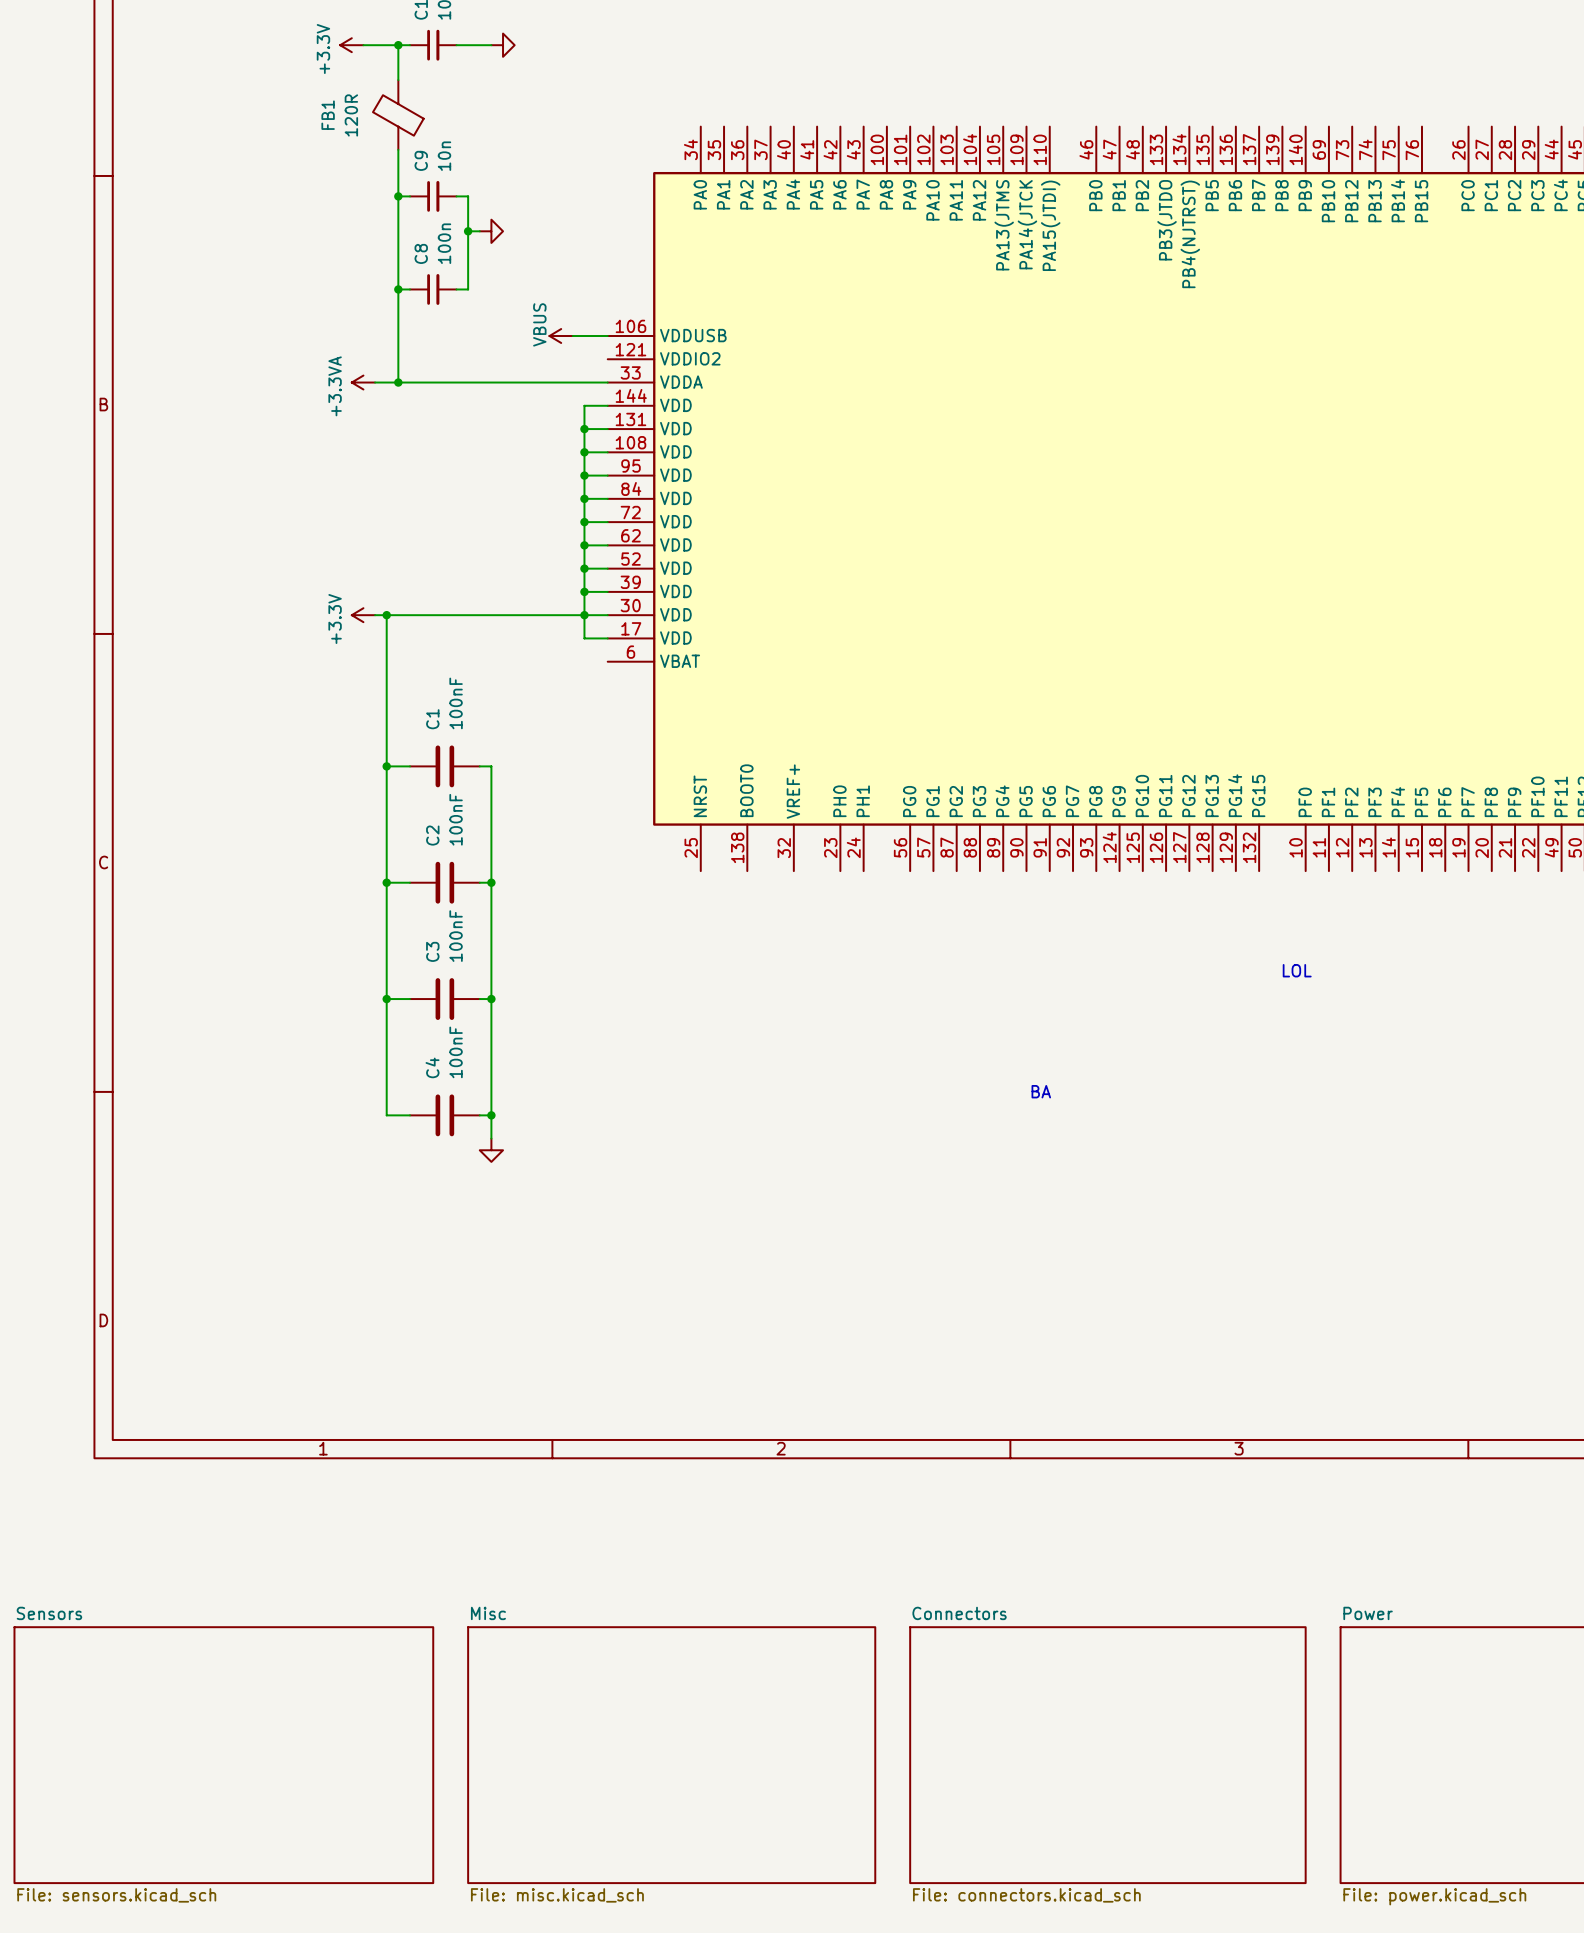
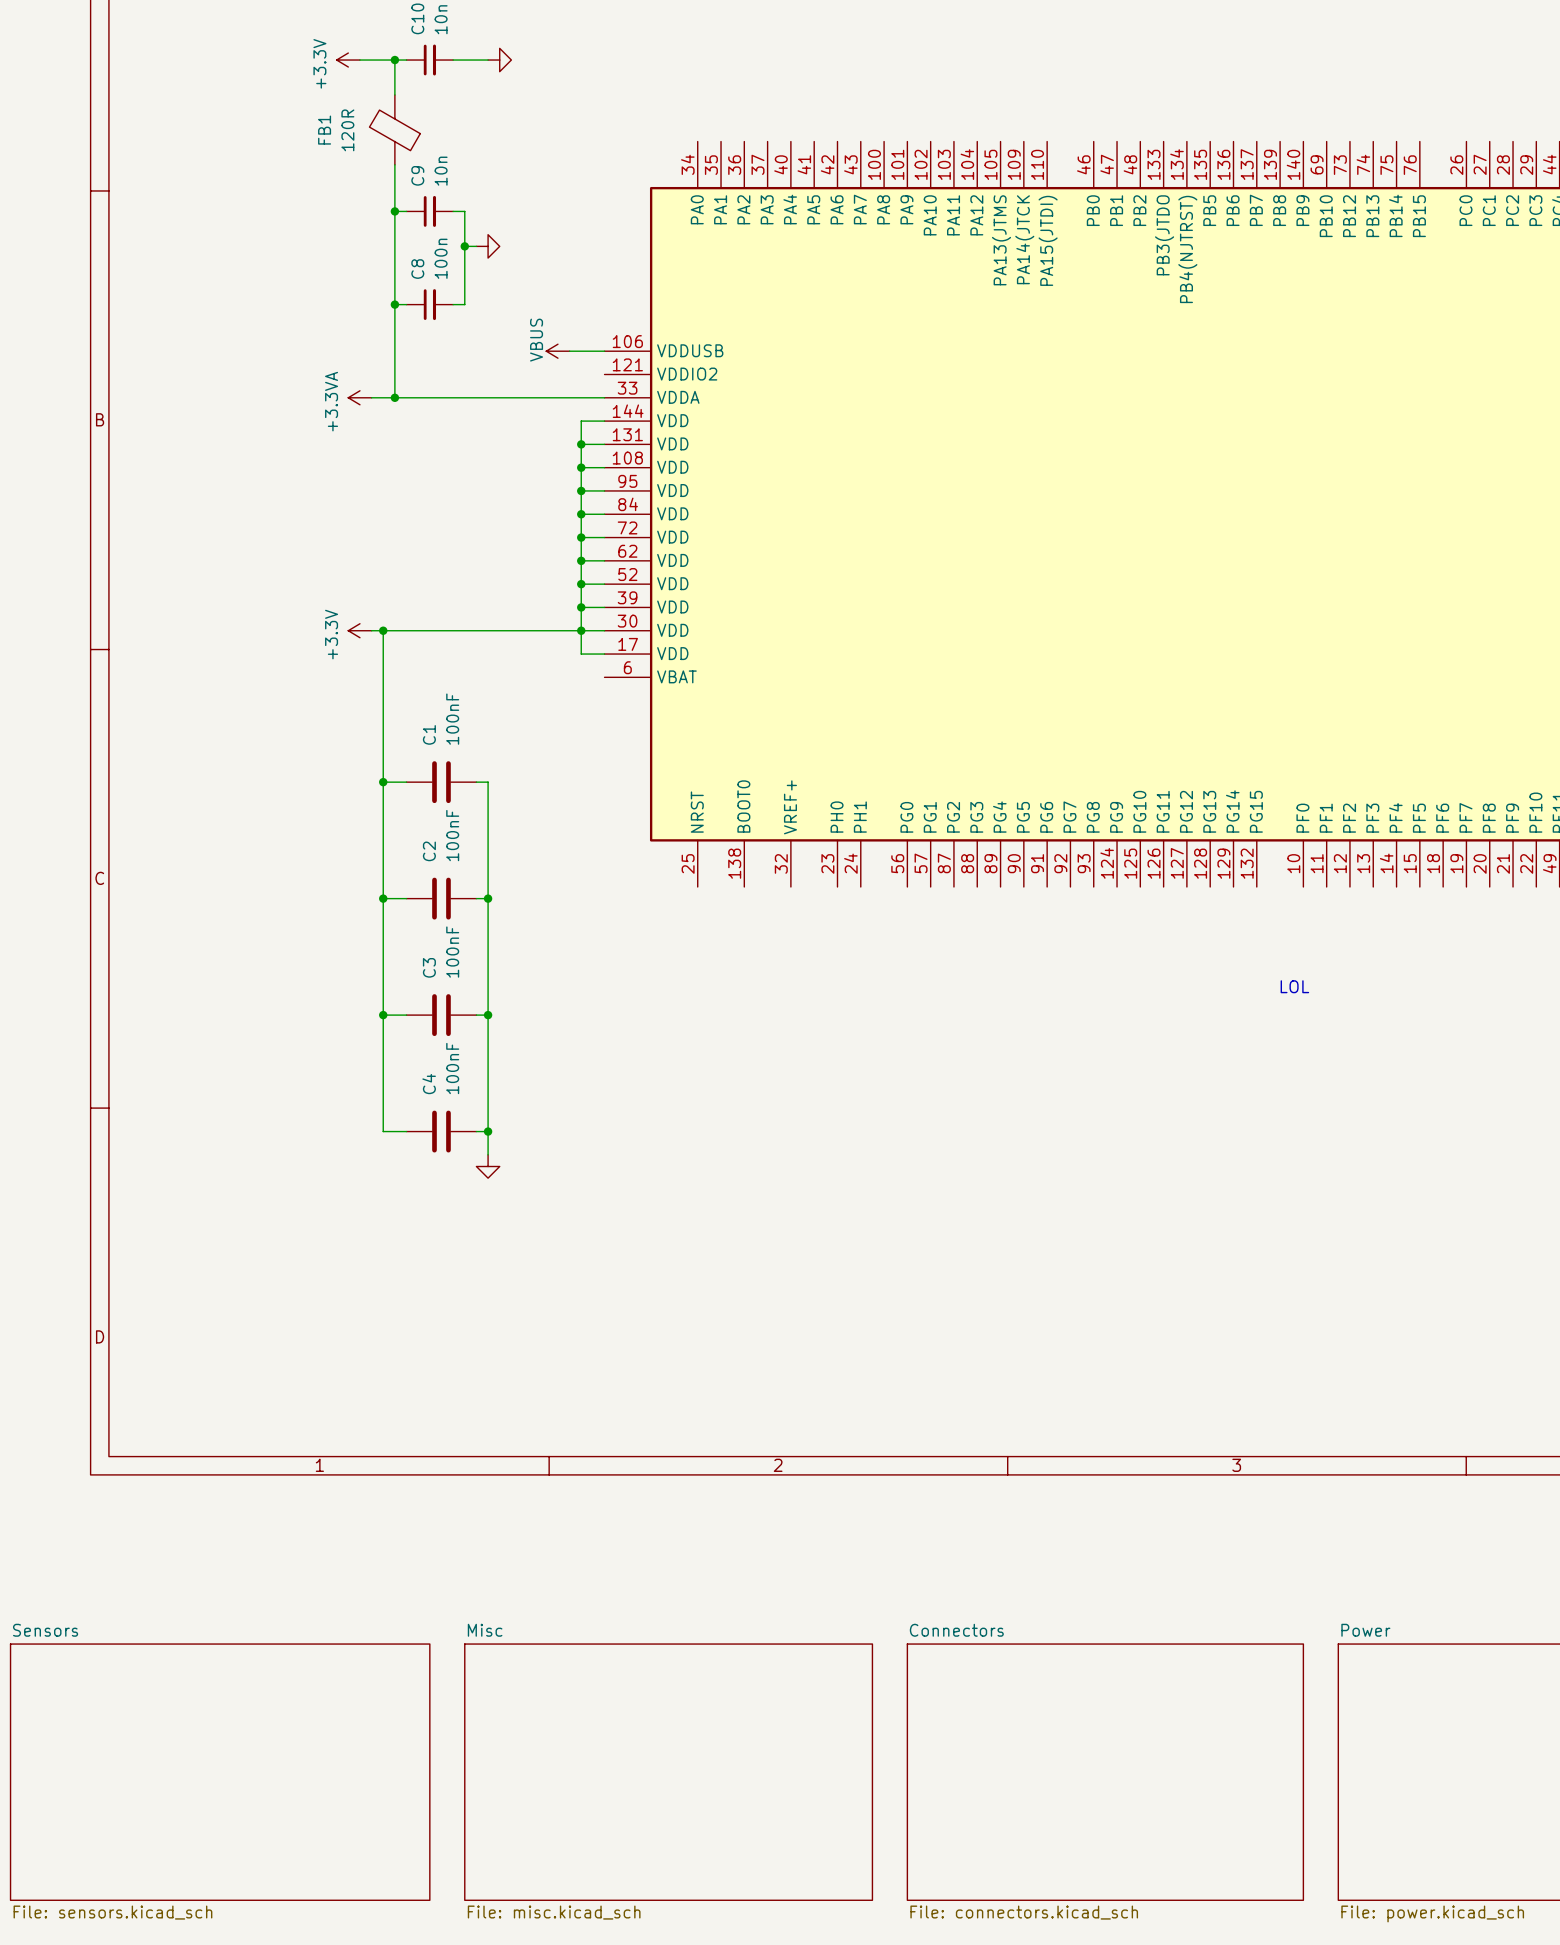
text: BA (1041, 1091) -> none

